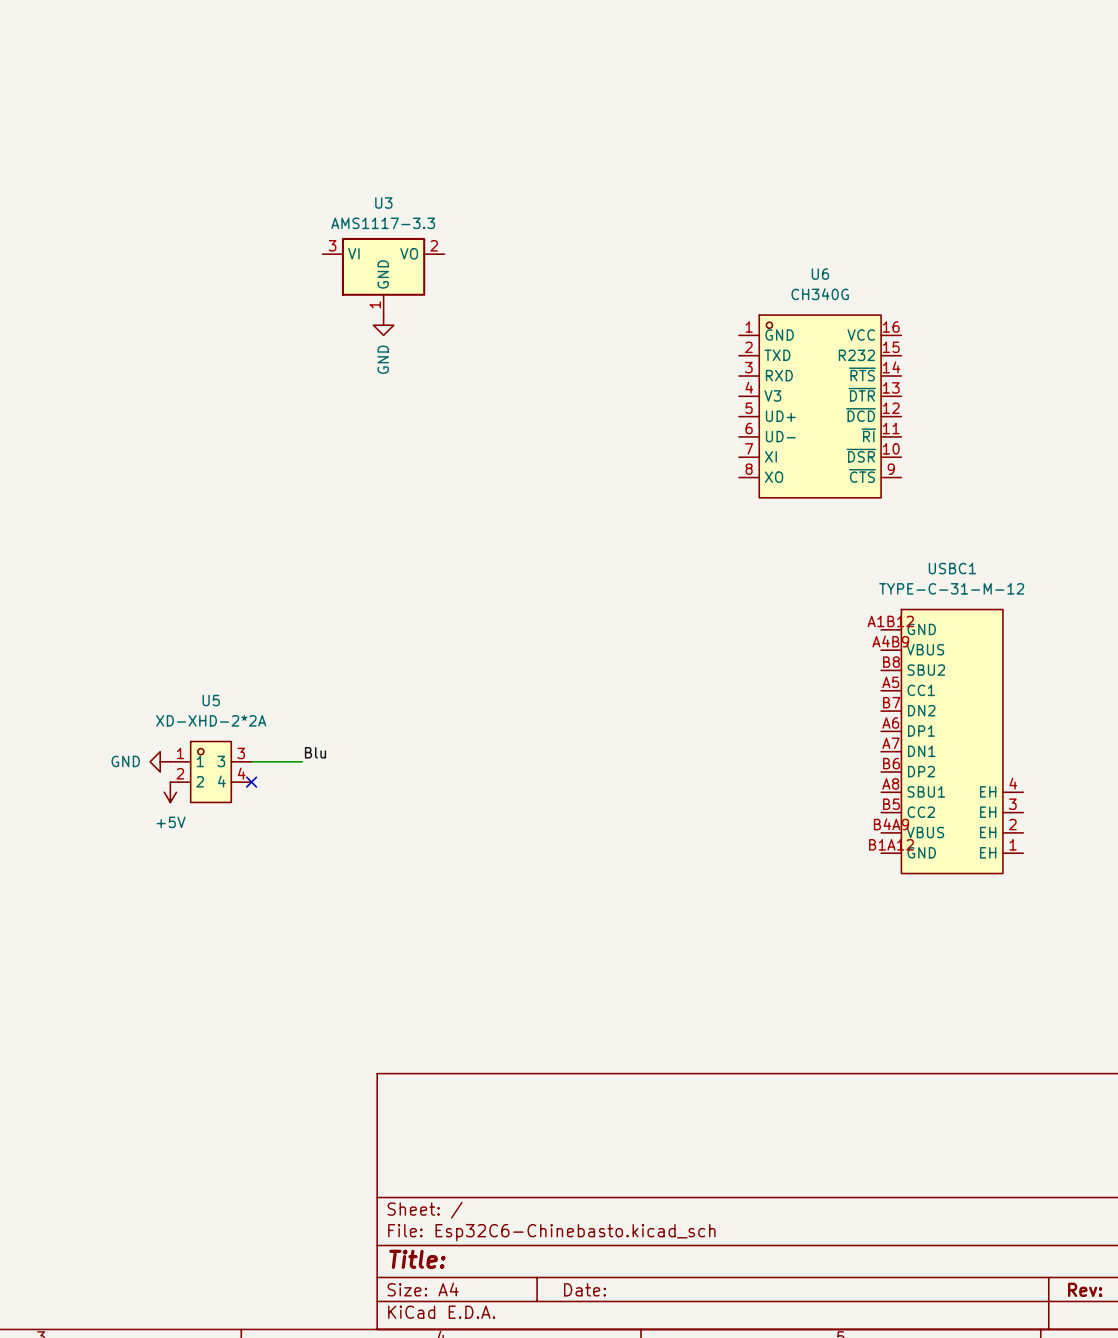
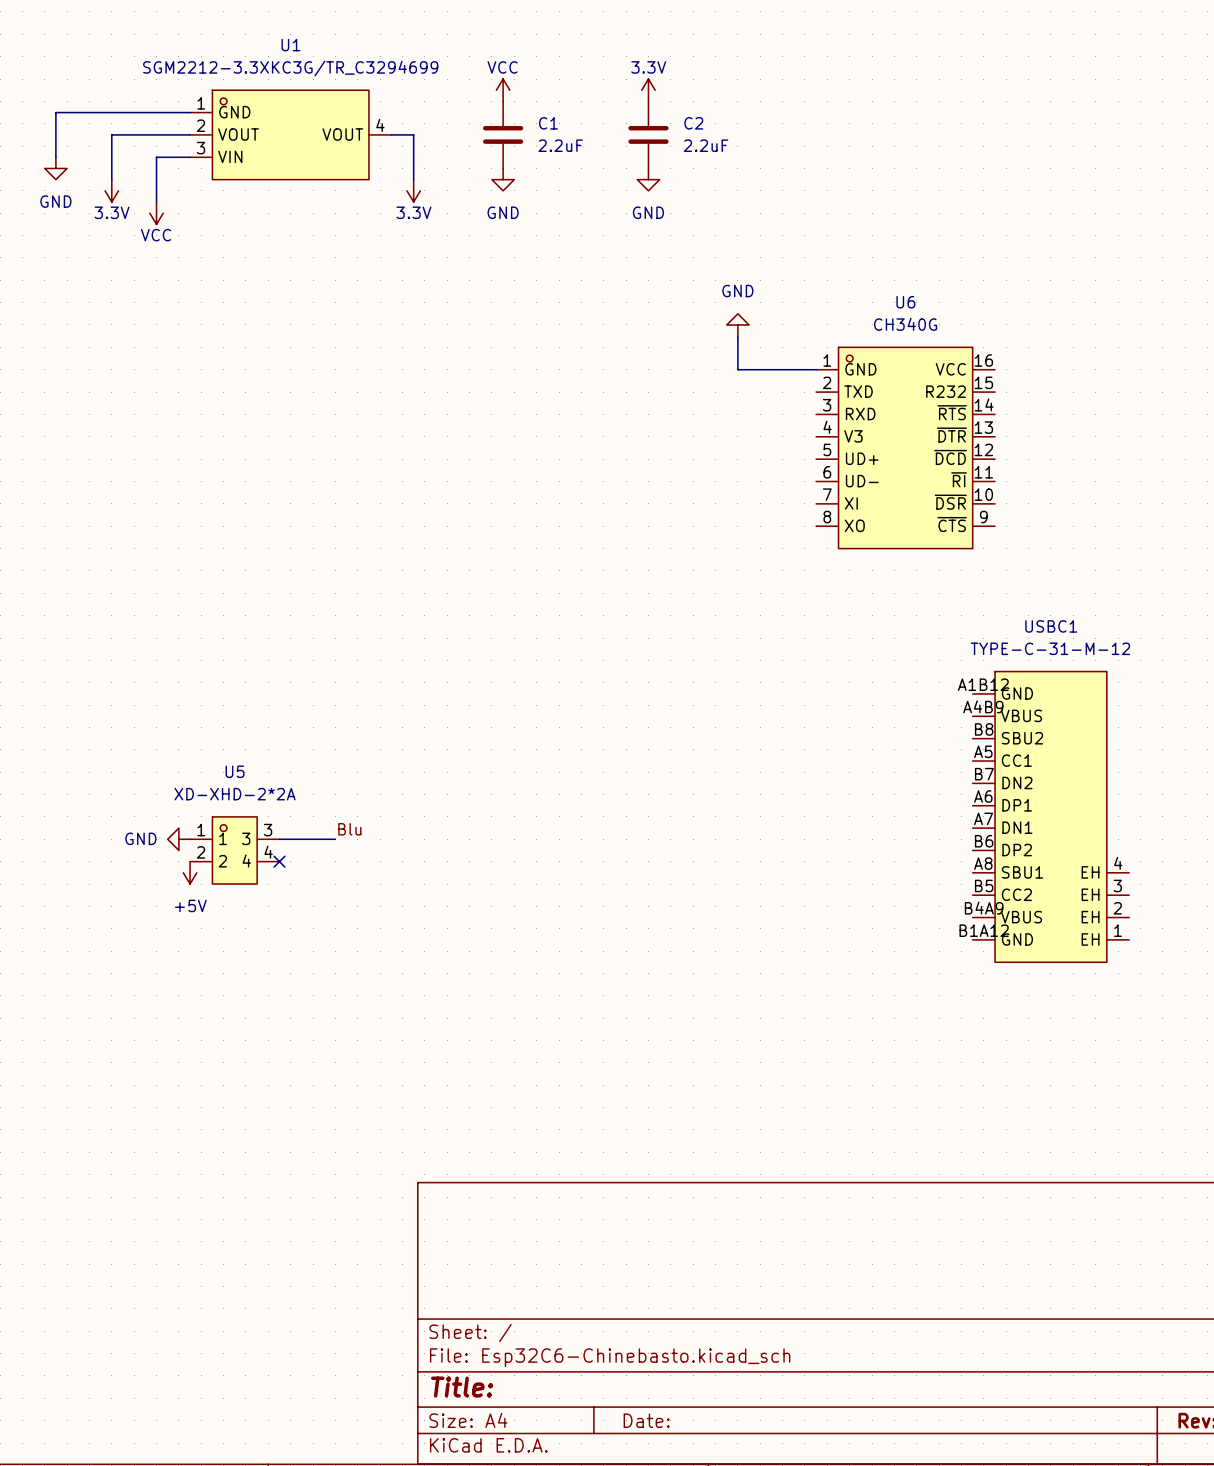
power symbol: none -> VCC (503, 90)
power symbol: none -> 3.3V (648, 90)
wire: none -> (190, 112) (55, 112) (55, 157)
wire: none -> (190, 134) (111, 134) (111, 179)
U1: none -> SGM2212-3.3XKC3G/TR_C3294699 (290, 134)
wire: none -> (391, 134) (413, 134) (413, 179)
C1: none -> 2.2uF (503, 134)
C2: none -> 2.2uF (648, 134)
wire: none -> (190, 157) (156, 157) (156, 202)
power symbol: none -> GND (55, 168)
power symbol: none -> GND (503, 179)
power symbol: none -> GND (648, 179)
power symbol: none -> 3.3V (111, 190)
power symbol: none -> 3.3V (413, 190)
power symbol: none -> VCC (156, 213)
U3: AMS1117-3.3 (383, 276) -> none
power symbol: none -> GND (737, 324)
wire: none -> (737, 336) (737, 369) (816, 369)
power symbol: GND (383, 325) -> none

